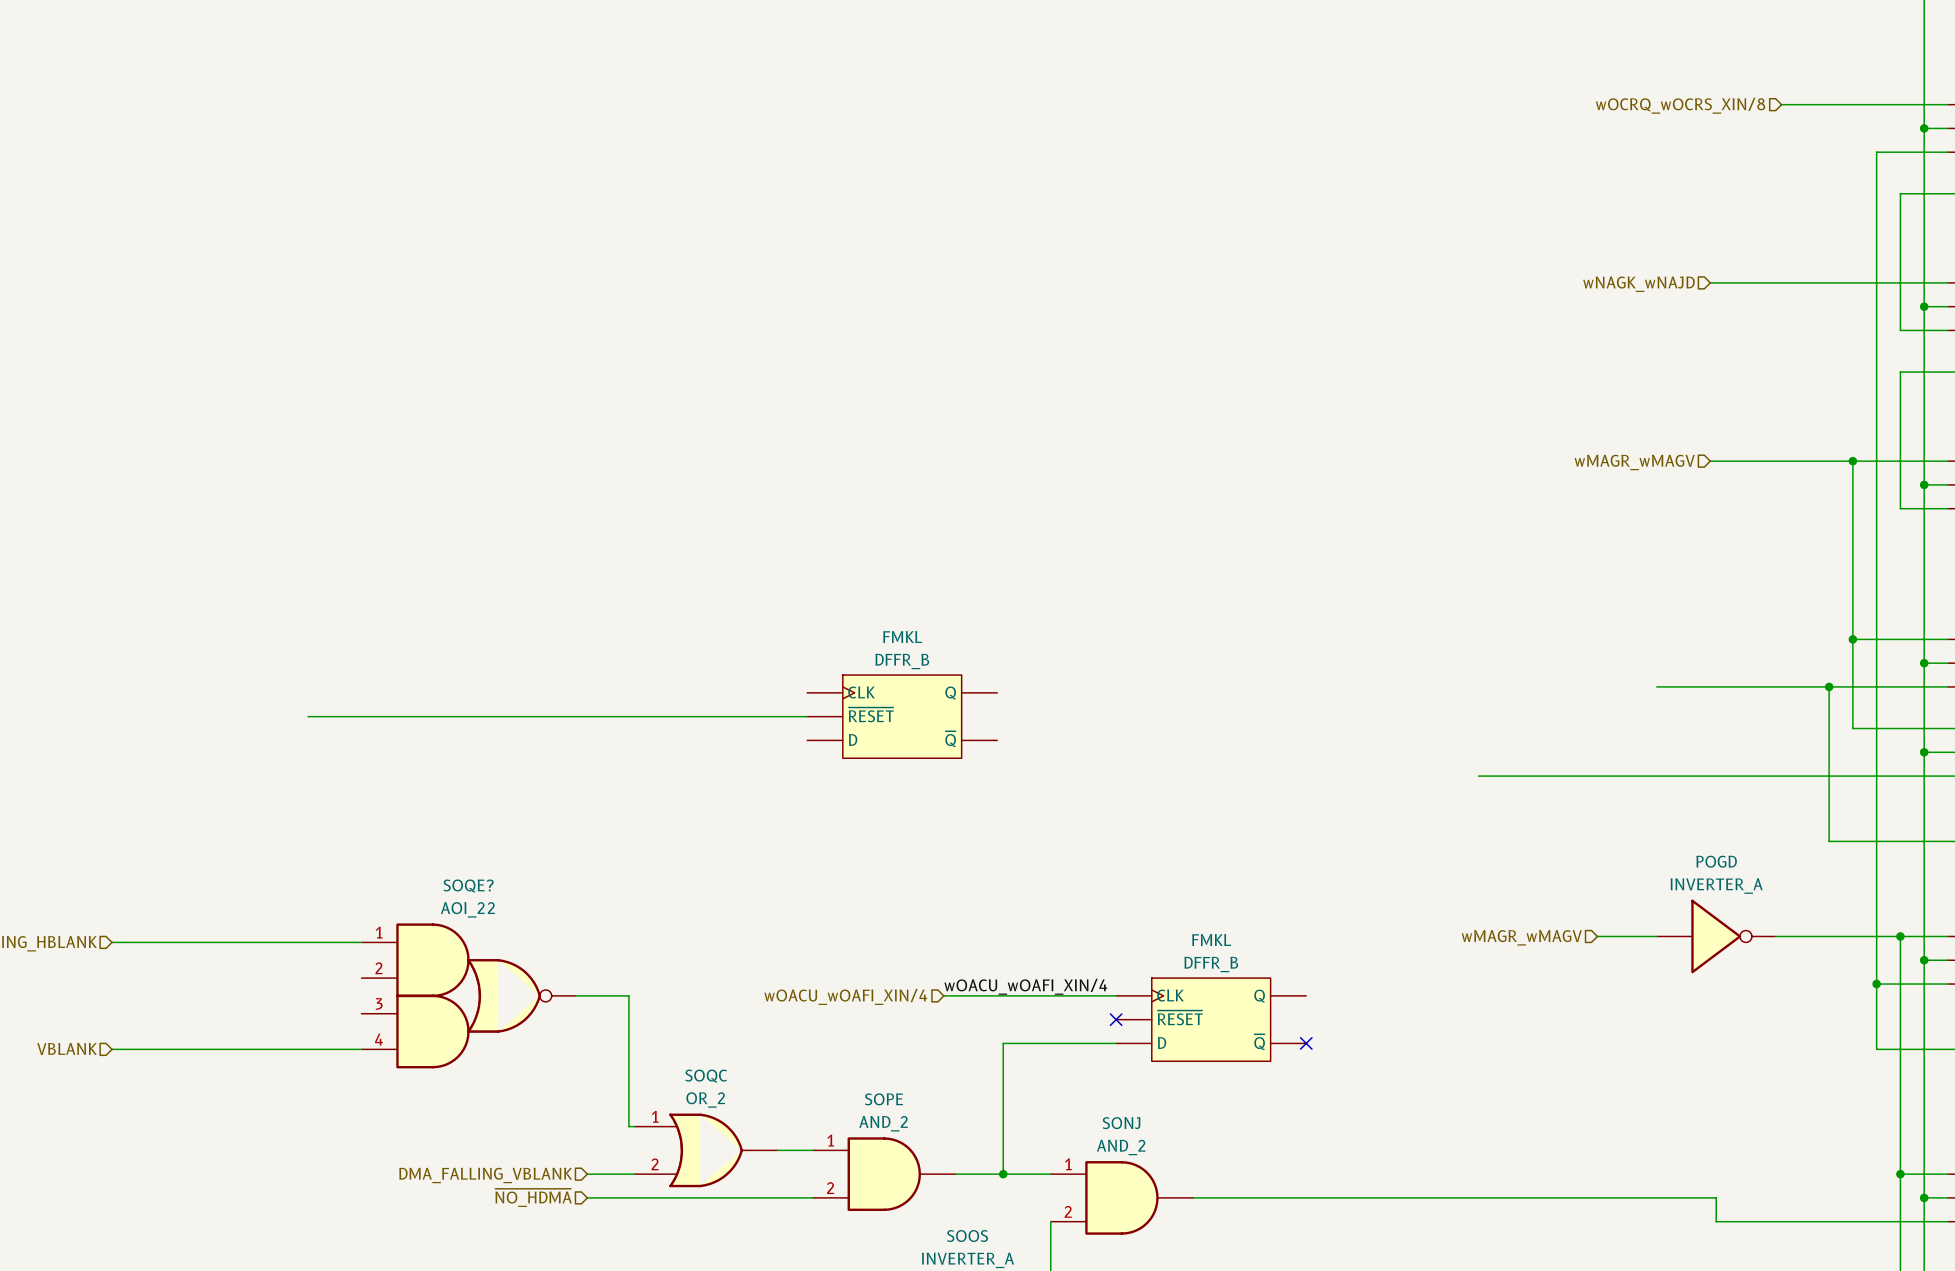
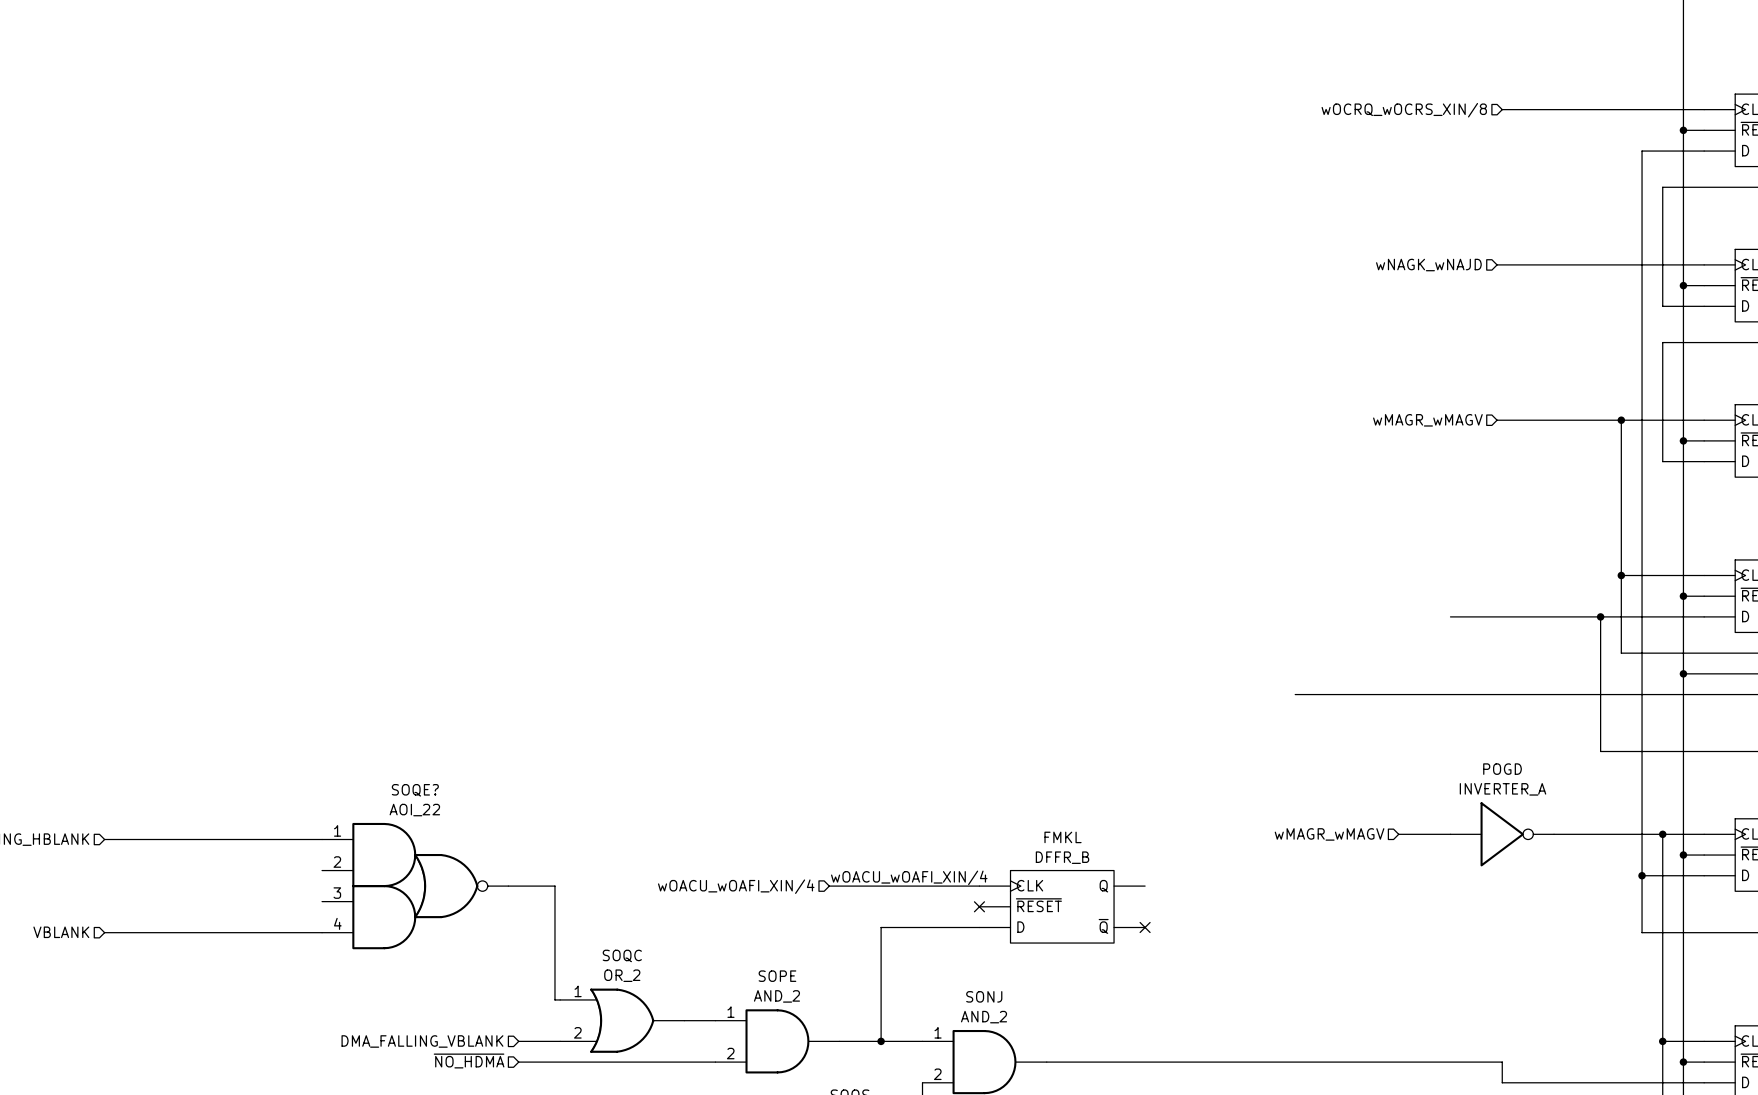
wire: none -> (1502, 109) (1559, 109)
hierarchical label position: wOCRQ_wOCRS_XIN/8 (1680, 105) -> wOCRQ_wOCRS_XIN/8 (1404, 110)
wire: (308, 716) (807, 716) -> none
FMKL: DFFR_B (902, 716) -> none

